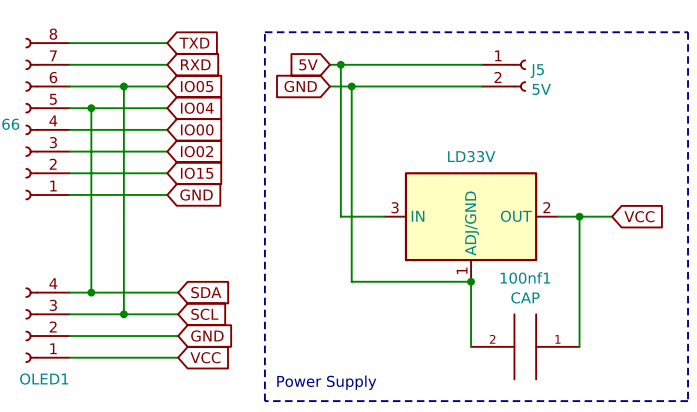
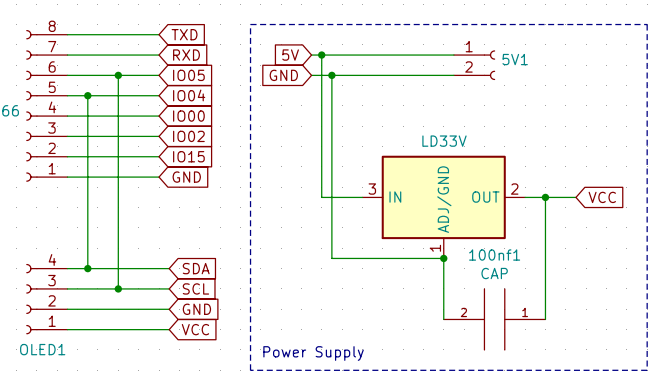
J5 name: J5 (537, 71) -> 5V1 (515, 59)
J5 value: 5V (541, 89) -> none

